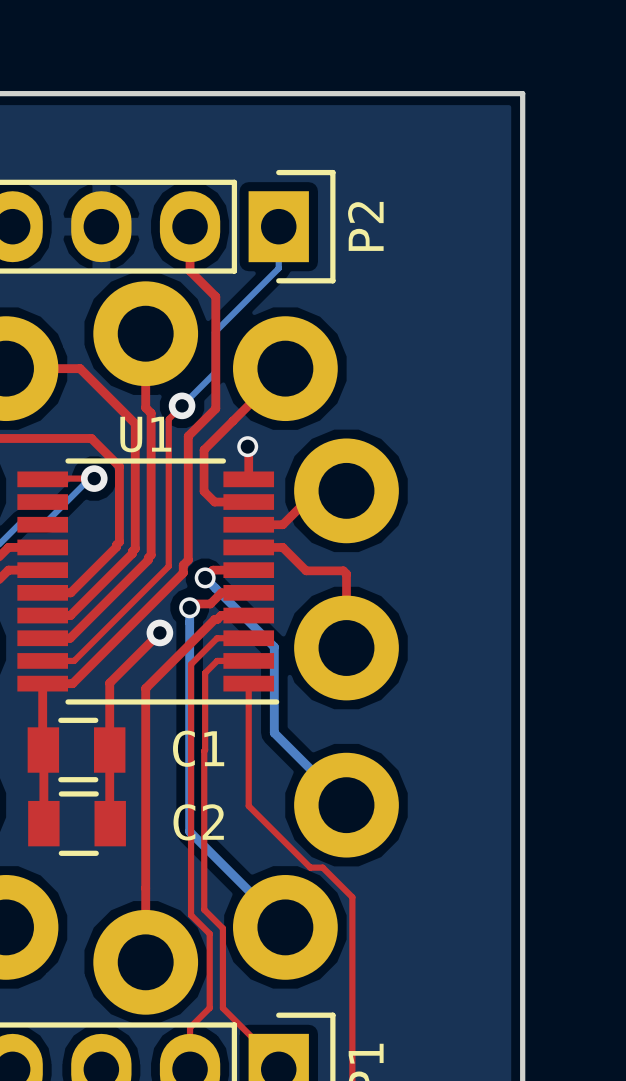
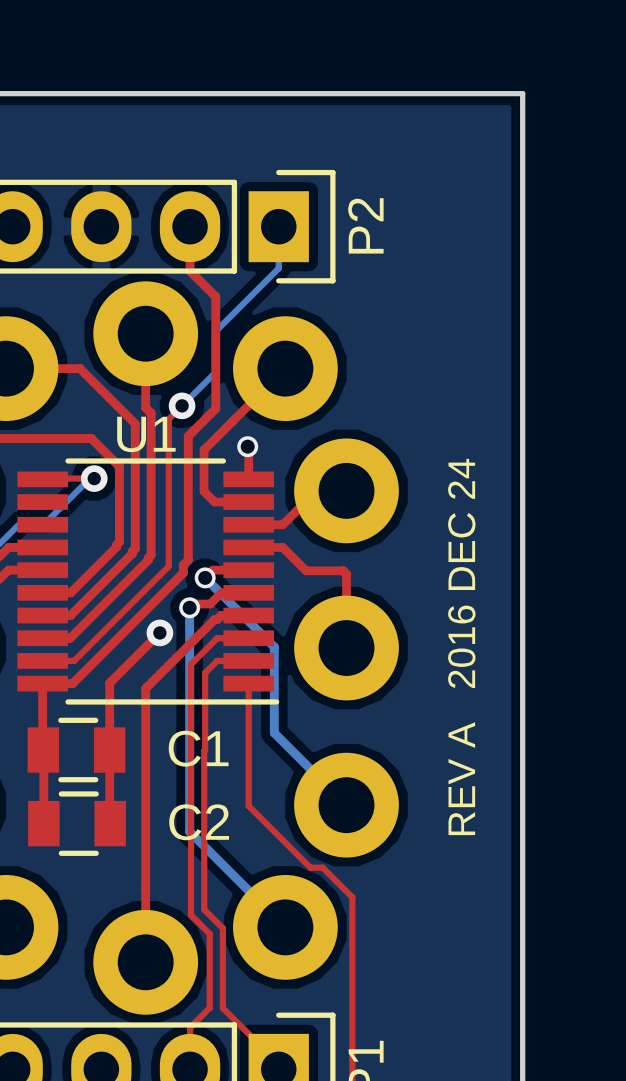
text: none -> REV A 2016 DEC 24 (461, 646)

